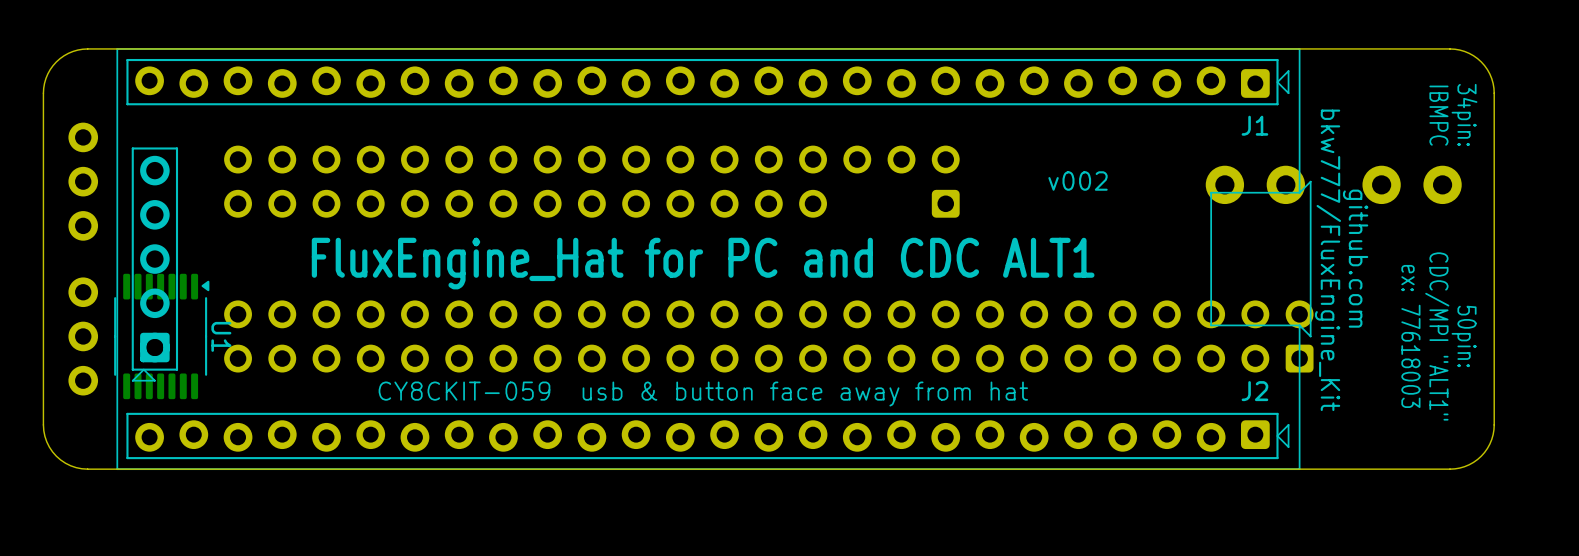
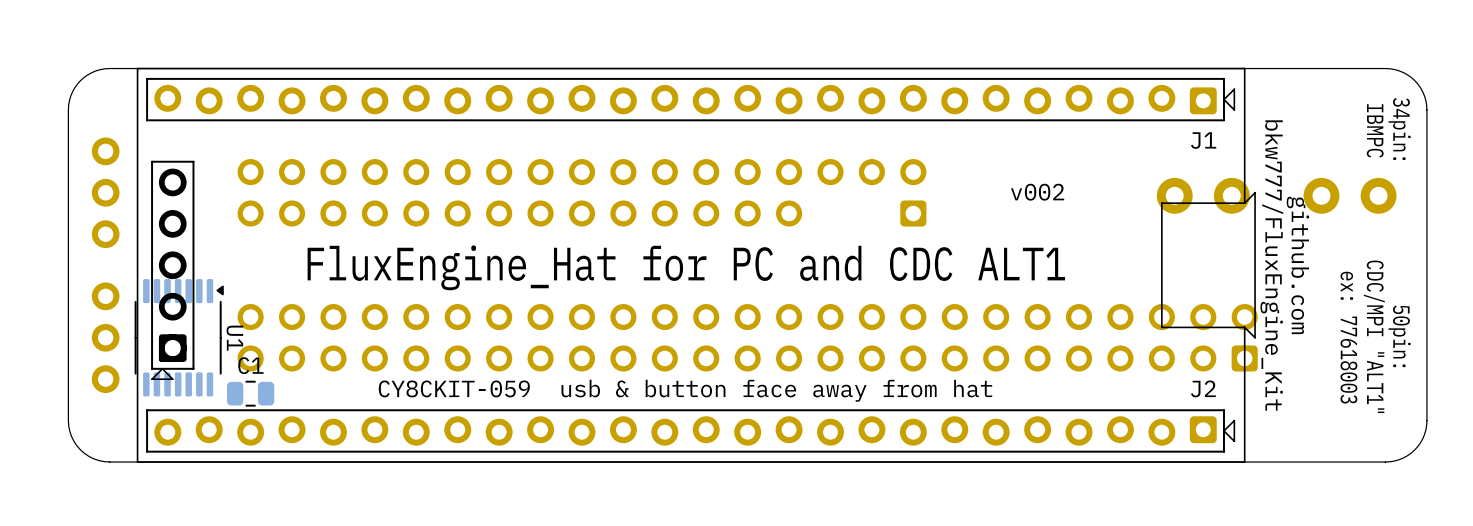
C1: none -> (250, 393)

